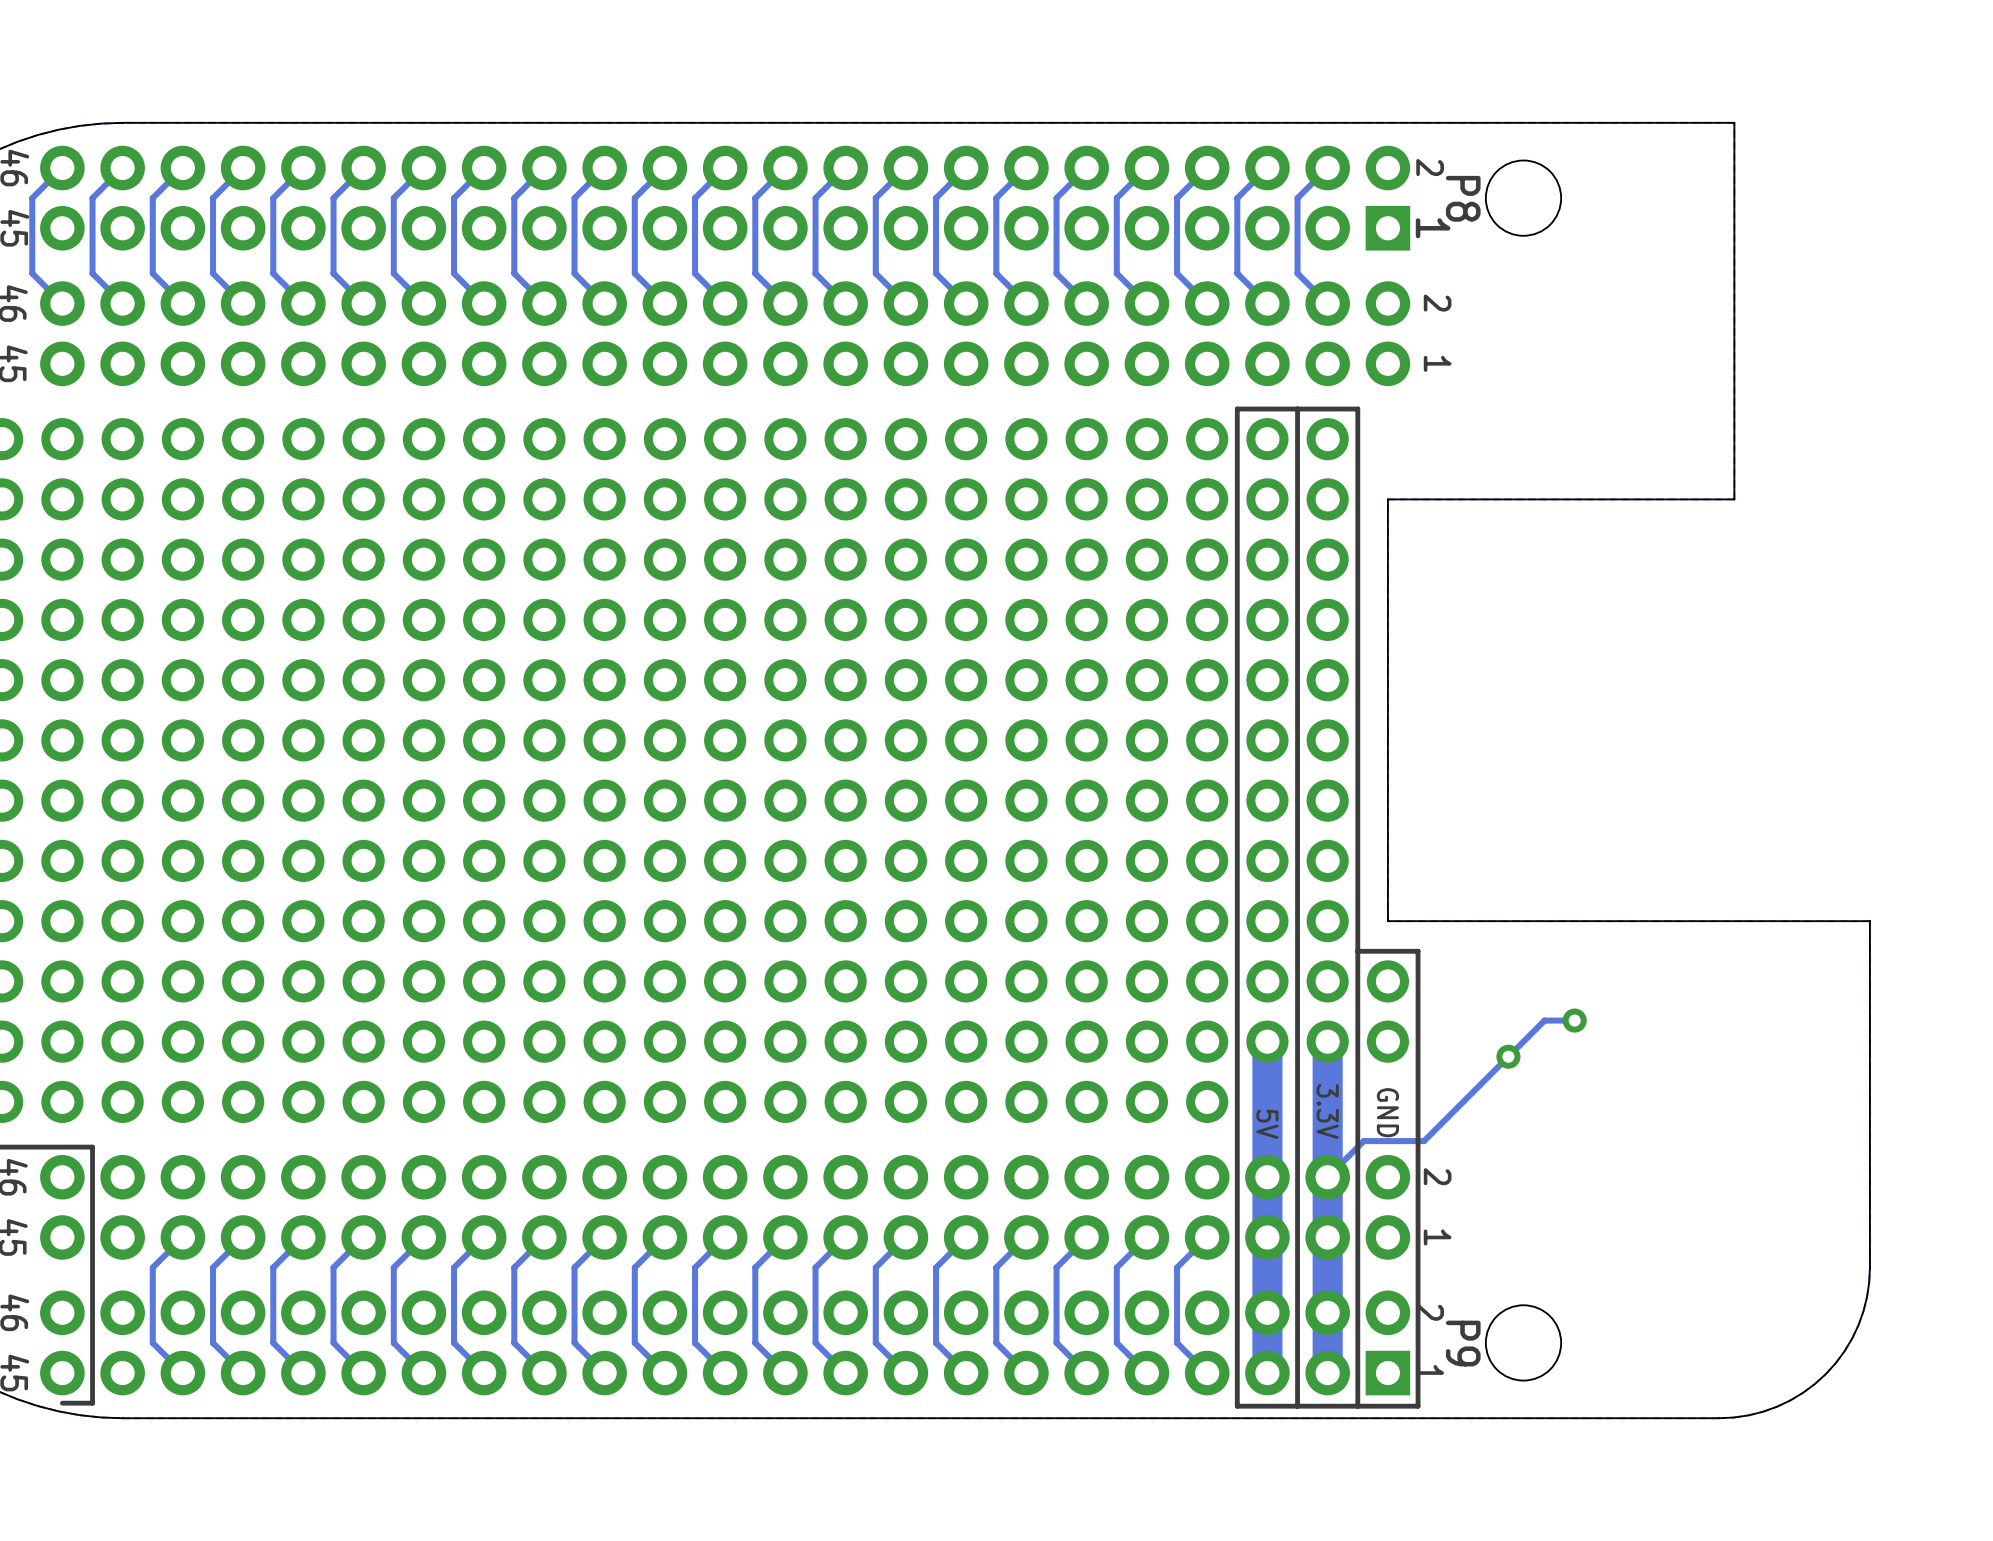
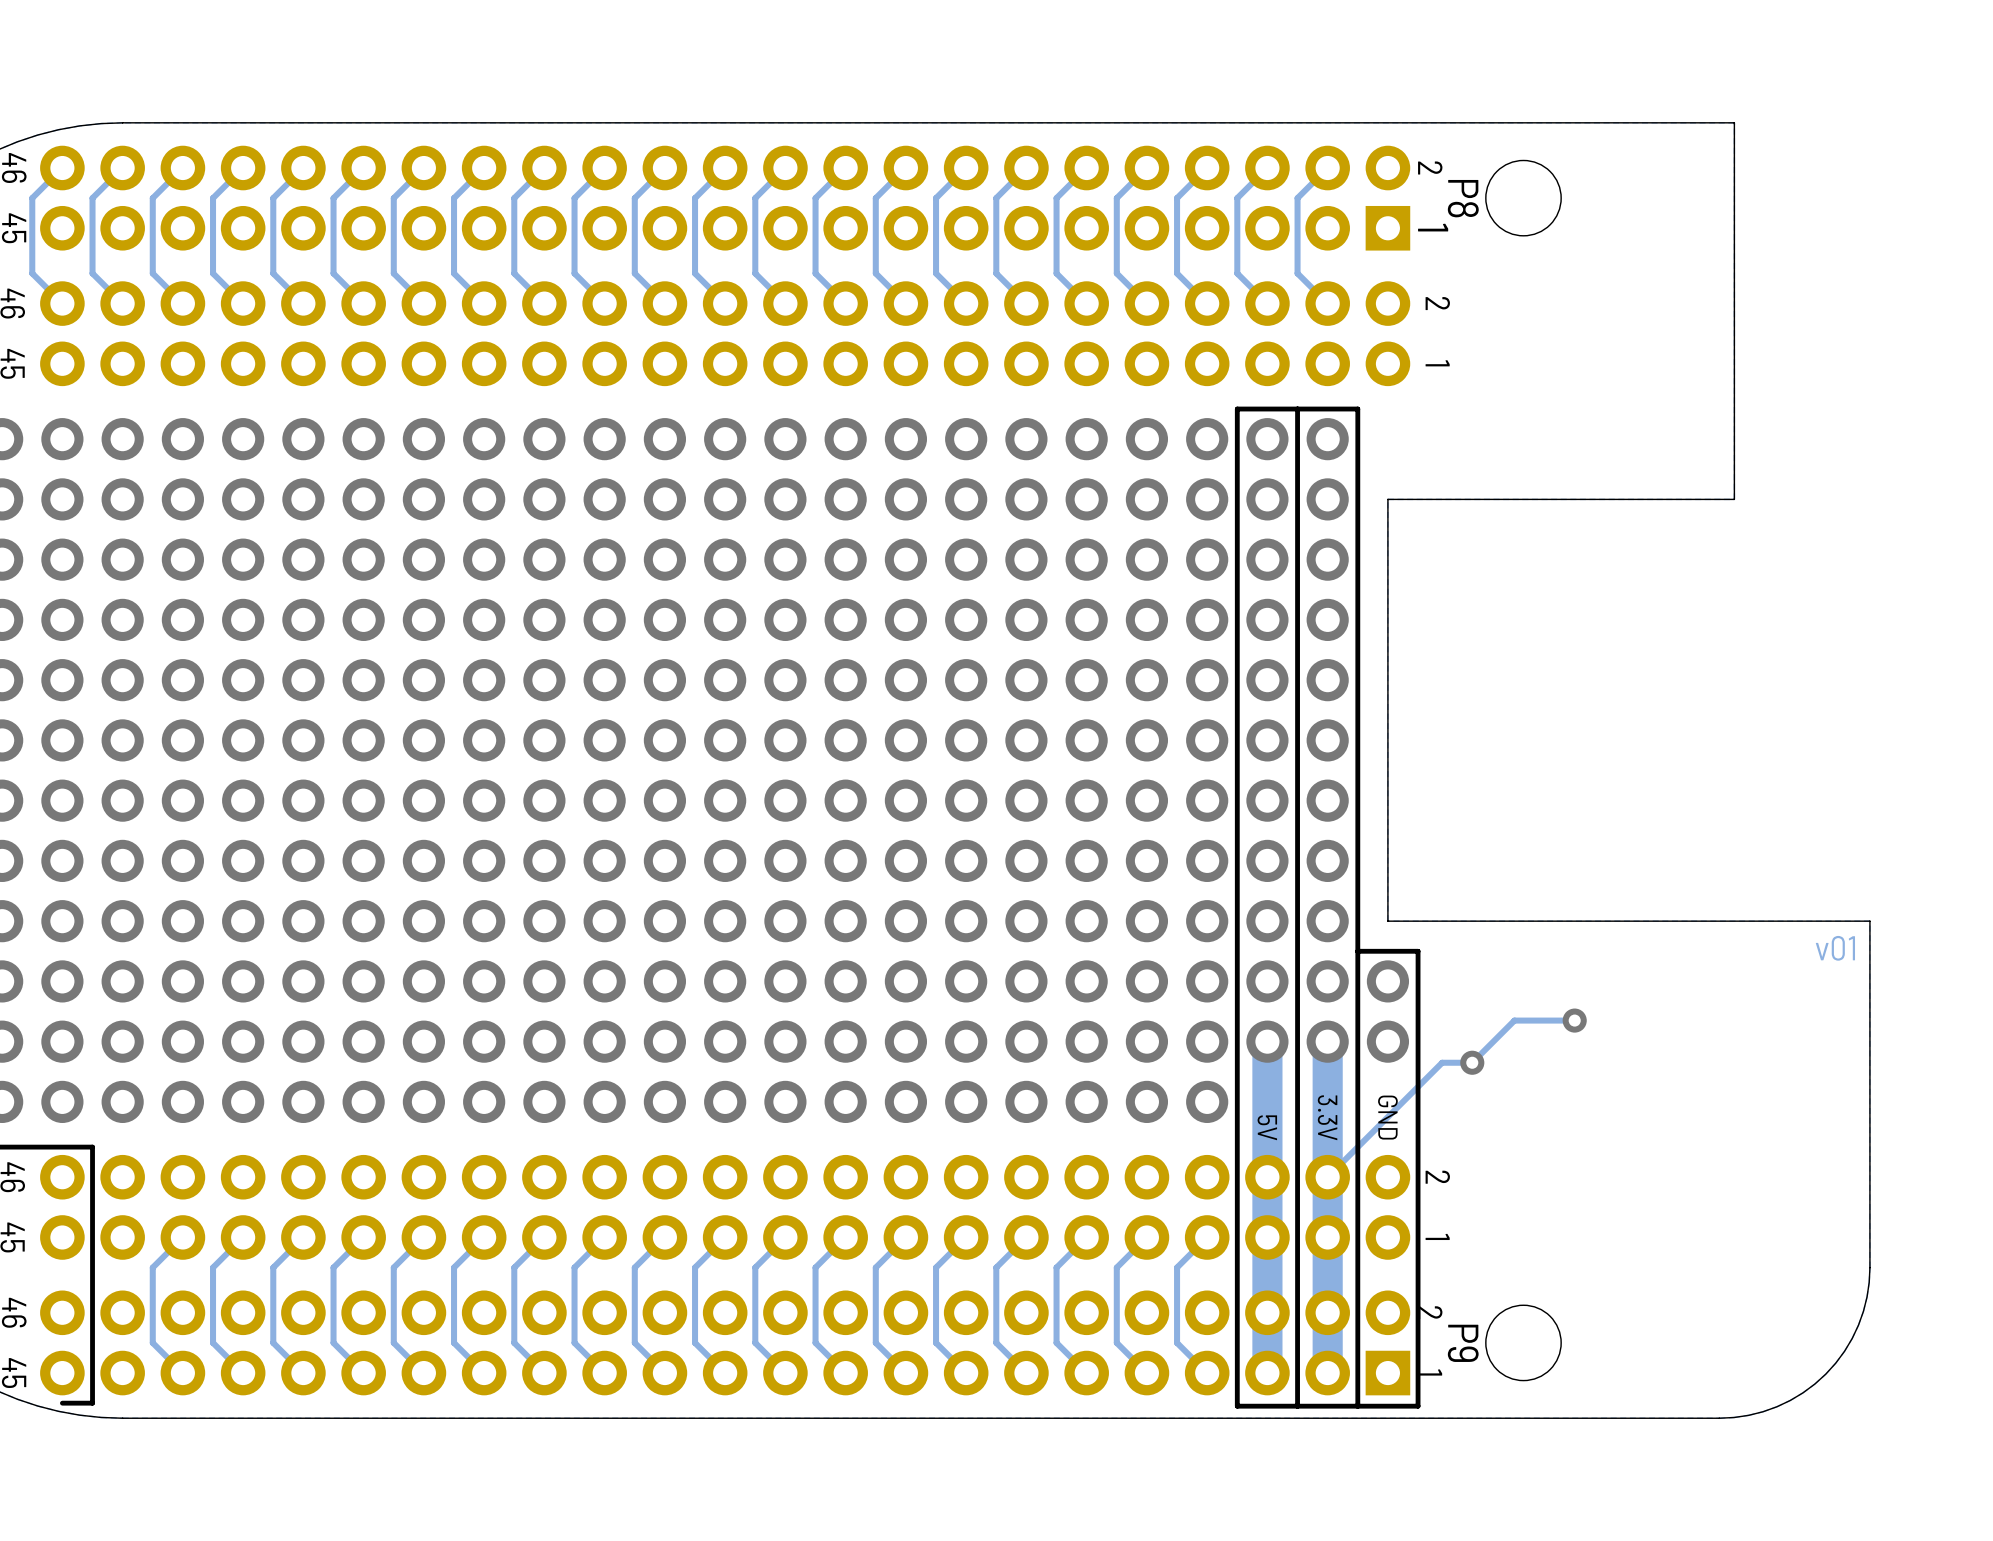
text: none -> v01 (1835, 948)
track: (1544, 1020) (1424, 1141) (1363, 1141) -> (1544, 1020) (1514, 1020) (1472, 1062) (1442, 1062) (1363, 1141)
via position: (1508, 1056) -> (1472, 1062)

